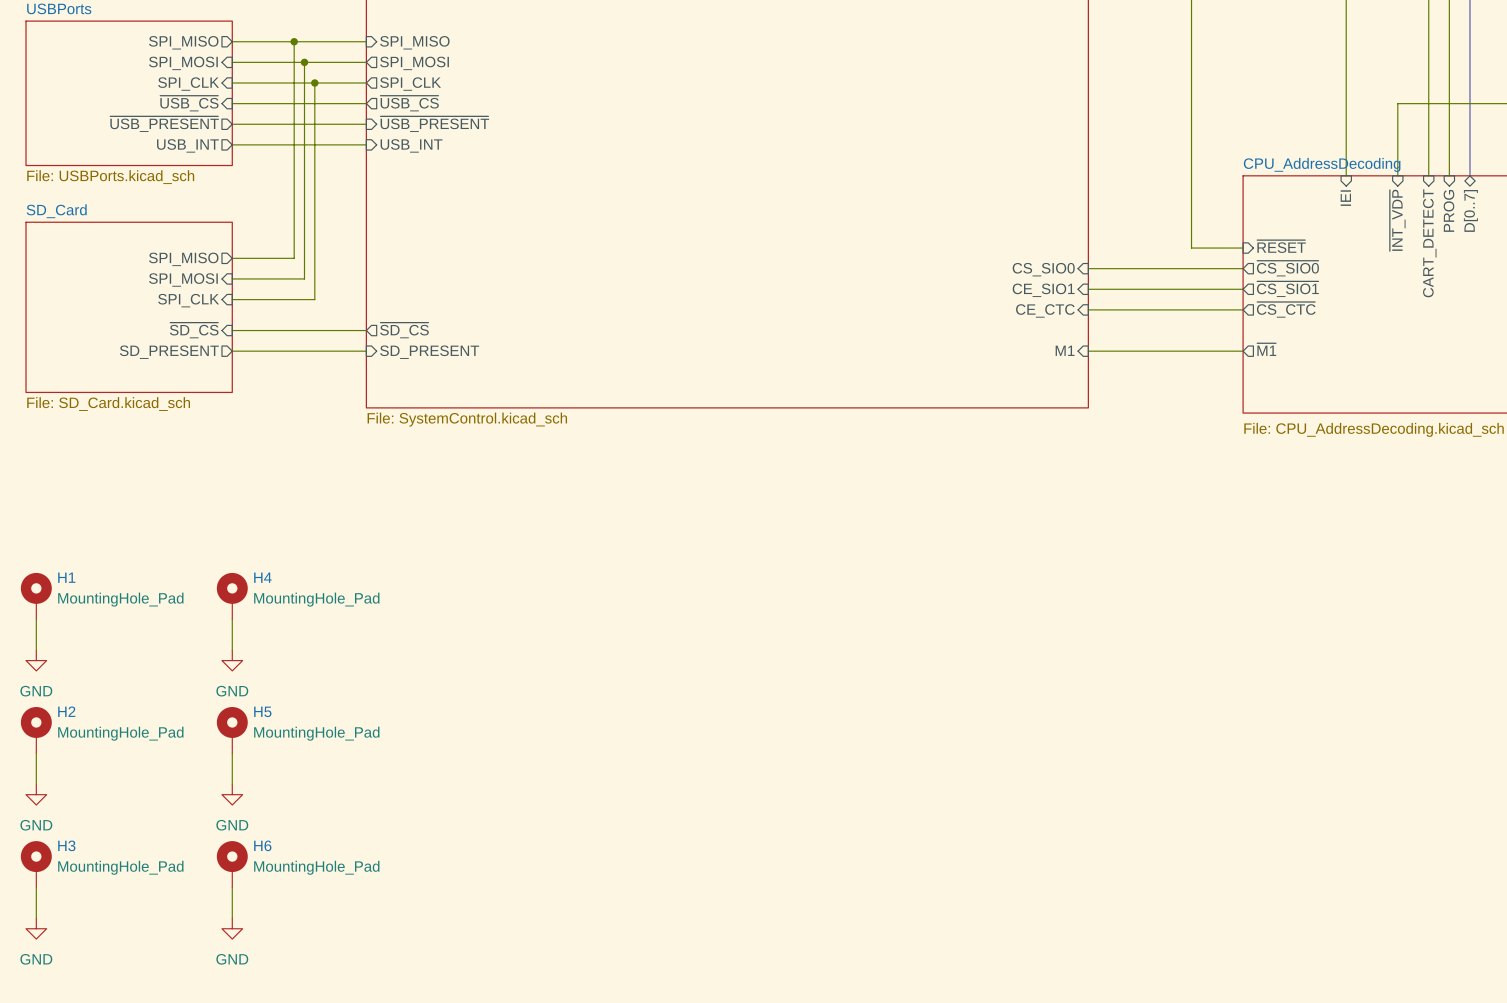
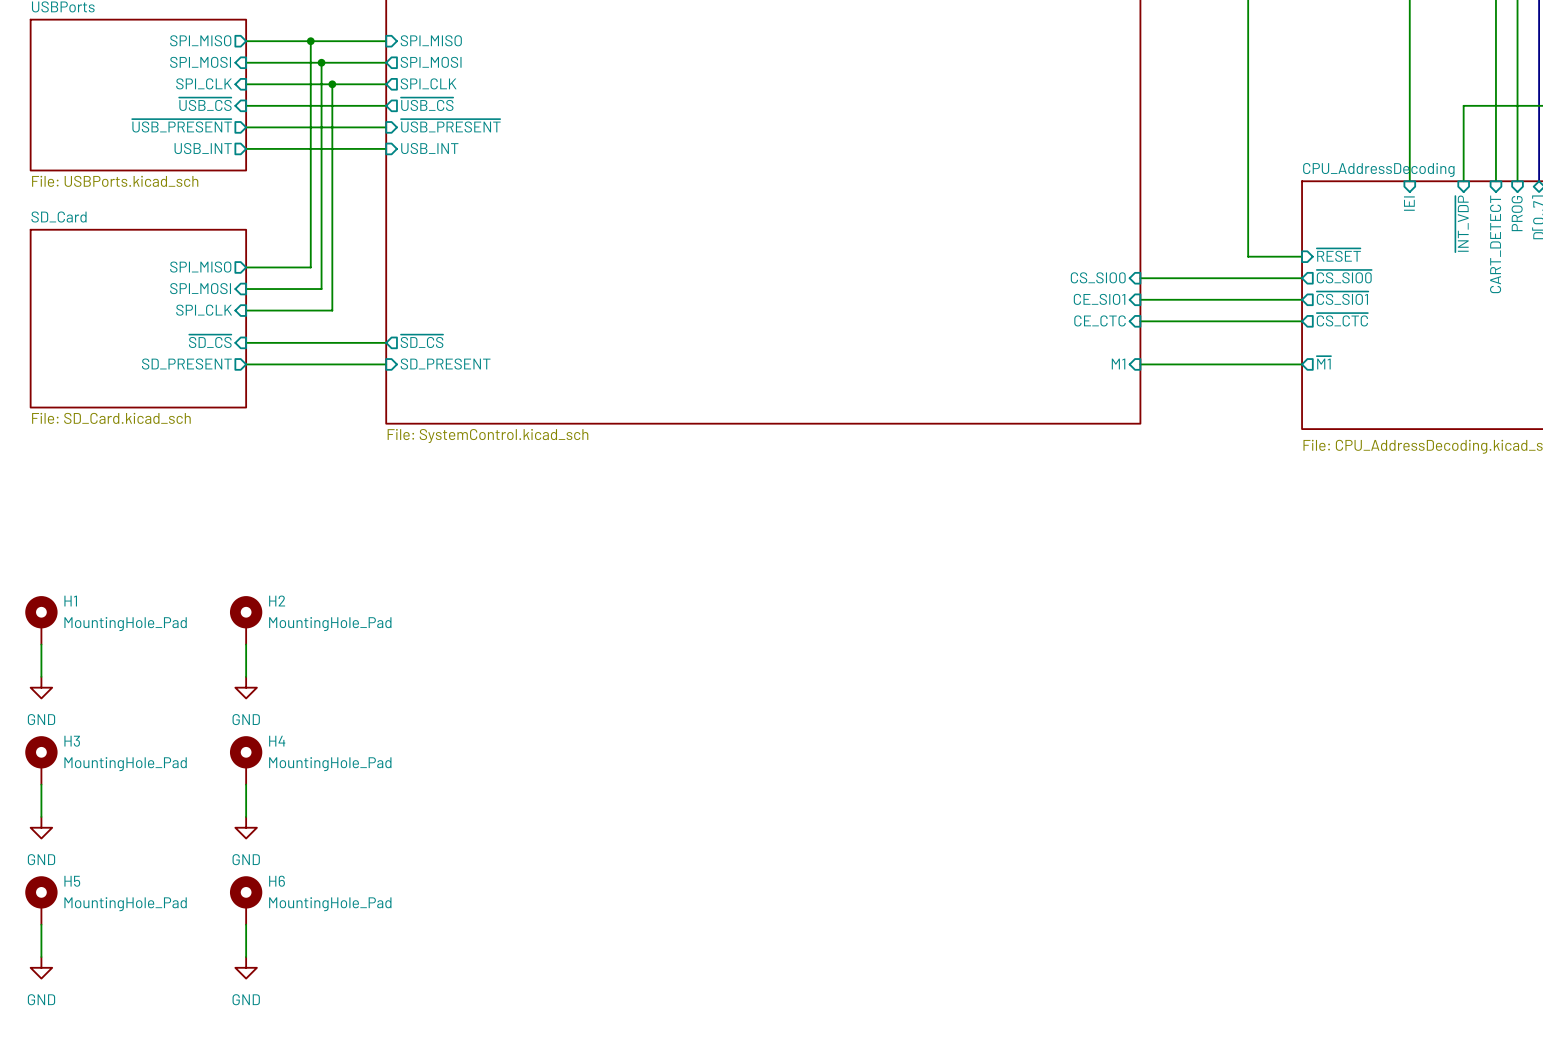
H4 name: H4 (262, 577) -> H2 (277, 601)
H2 name: H2 (66, 711) -> H3 (72, 741)
H5 name: H5 (262, 711) -> H4 (277, 741)
H3 name: H3 (66, 845) -> H5 (72, 881)

